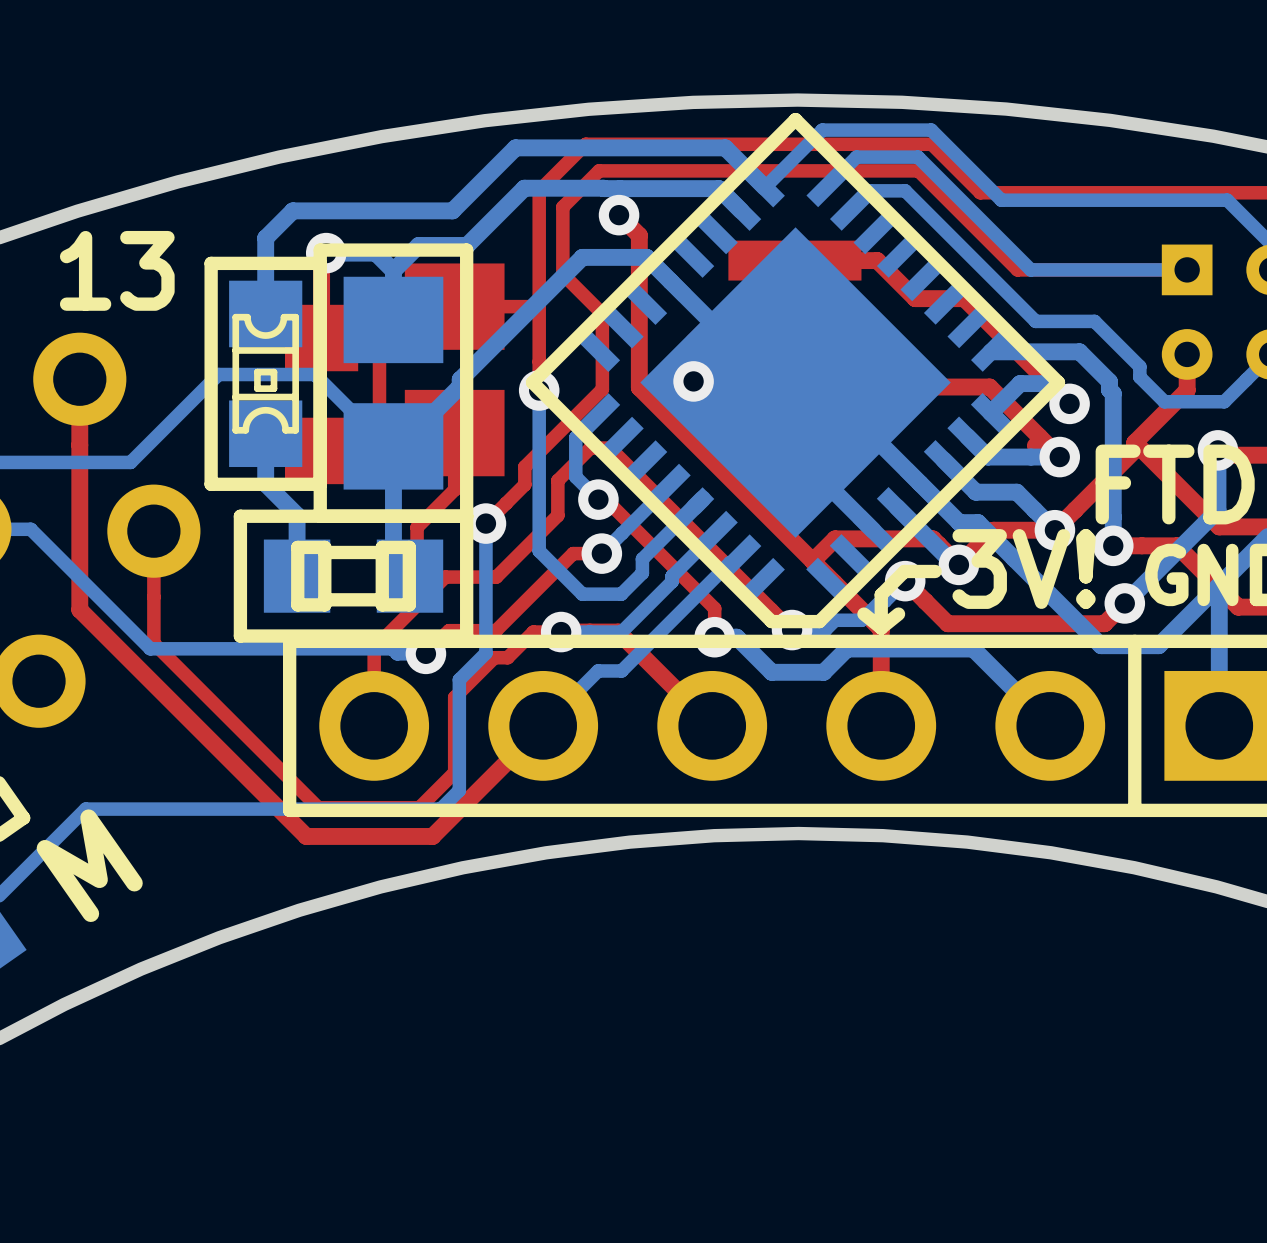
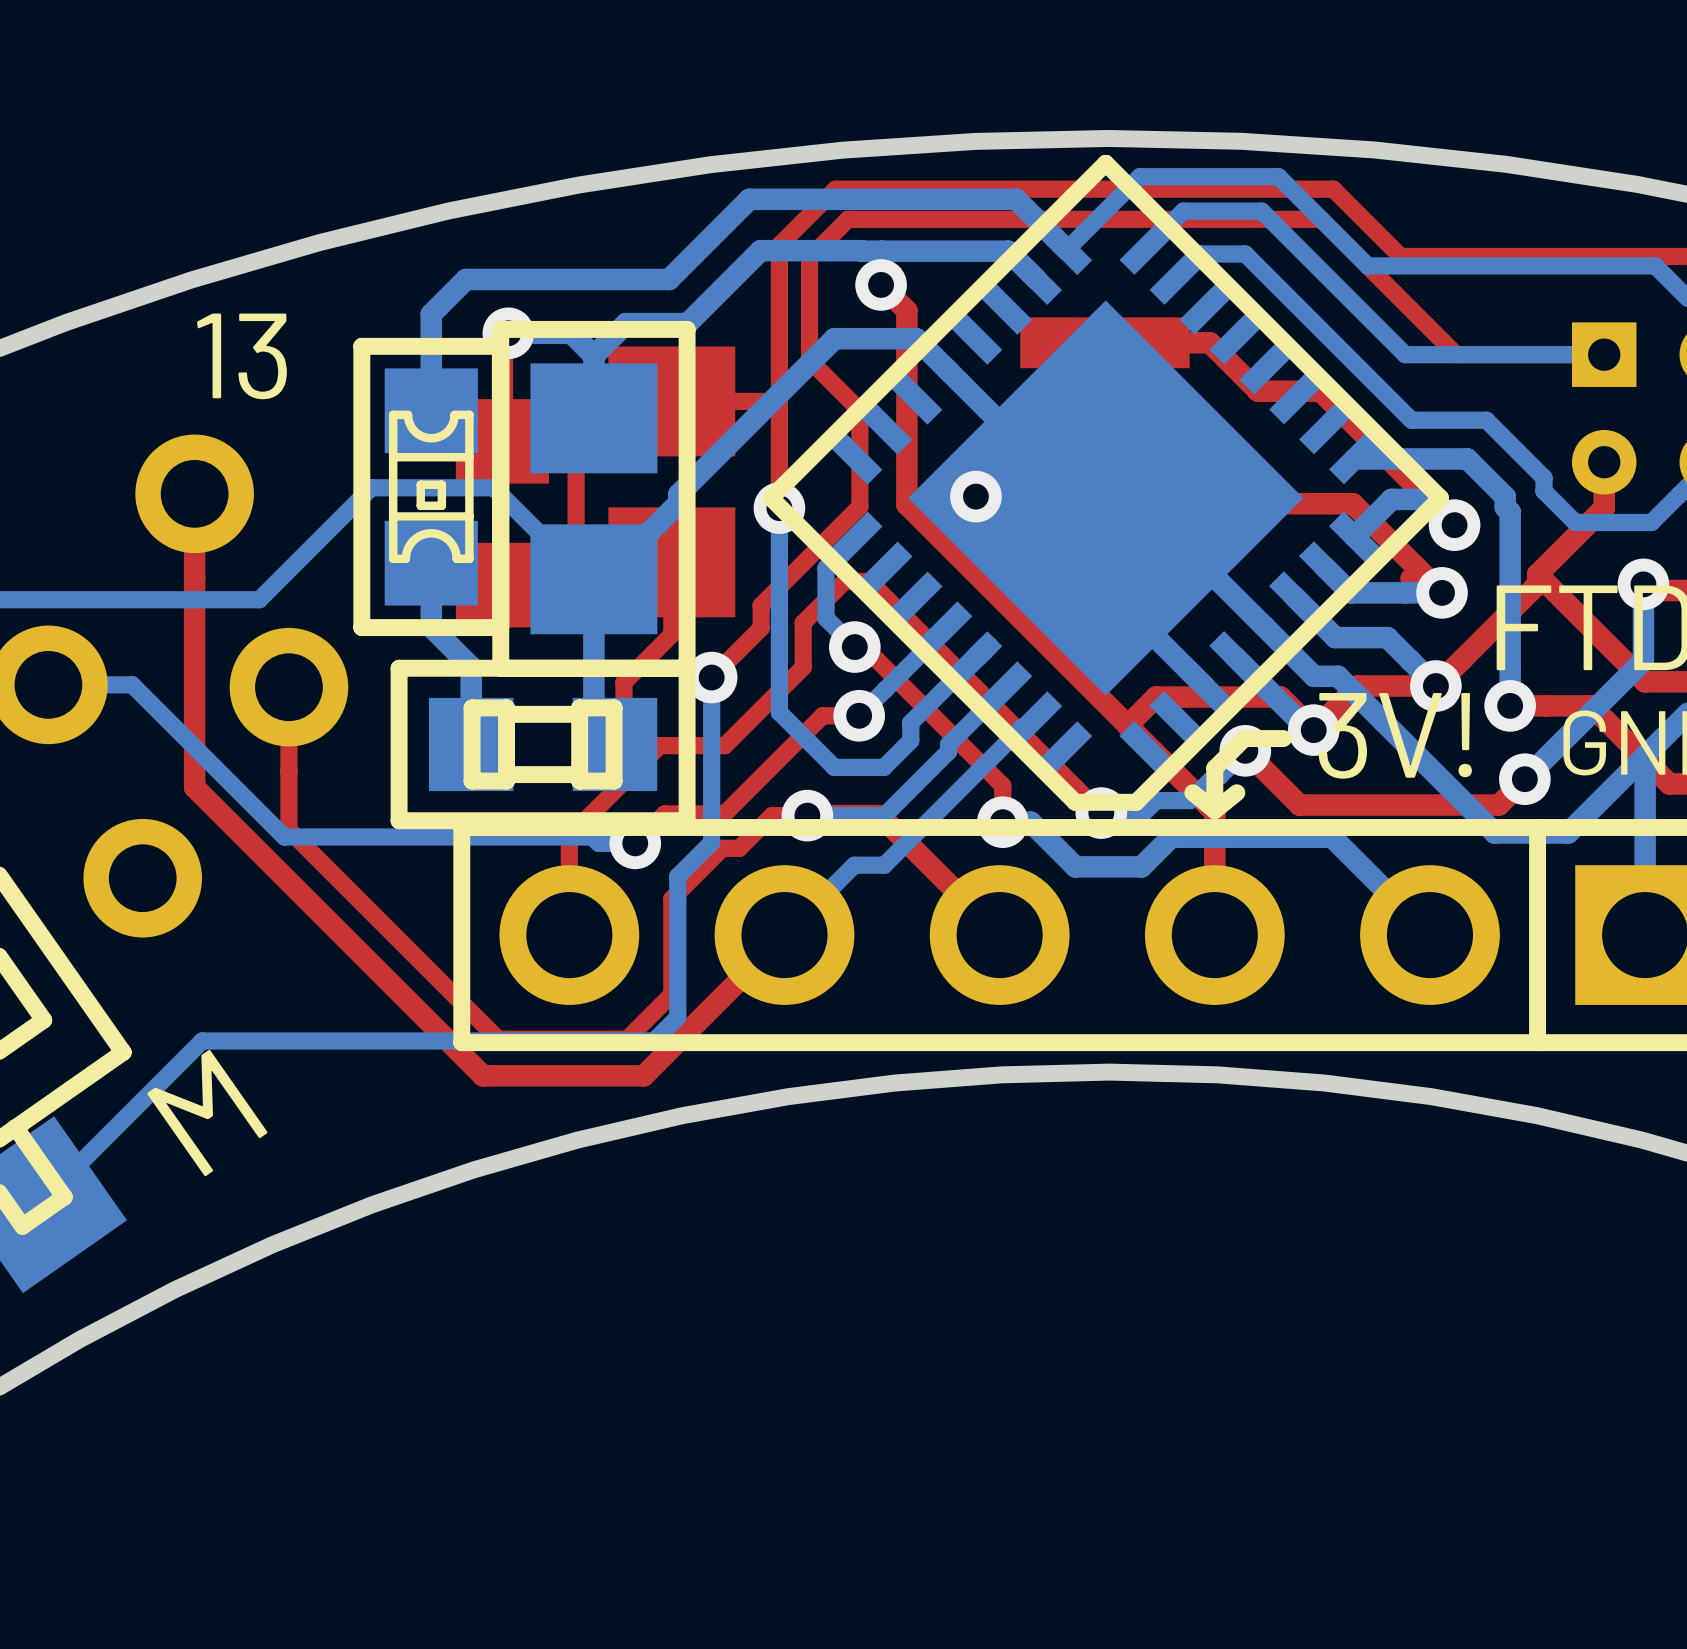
top track: (539, 190) (585, 144) (931, 144) (980, 192) (1027, 192) -> (779, 254) (779, 245) (835, 189) (1333, 189) (1400, 256)
top track: (562, 207) (599, 170) (918, 170) (1017, 269) (1070, 269) -> (809, 274) (809, 257) (848, 219) (1320, 219) (1456, 354)

